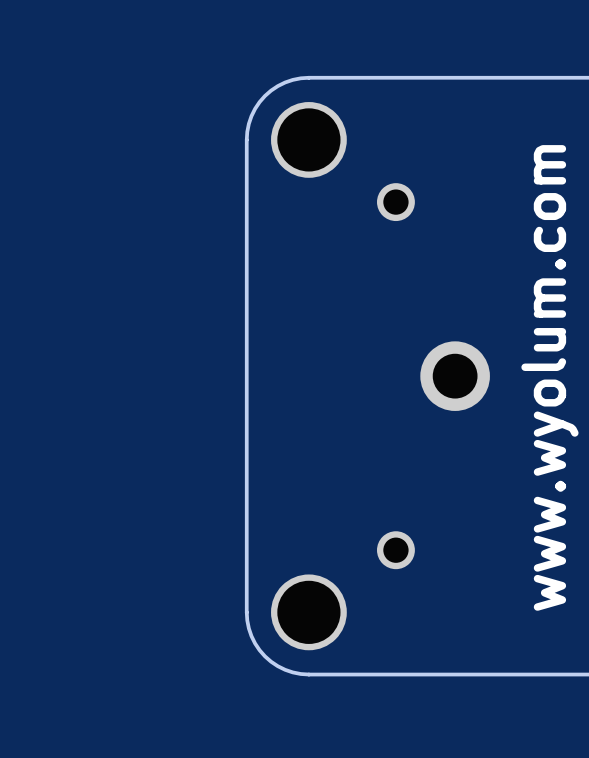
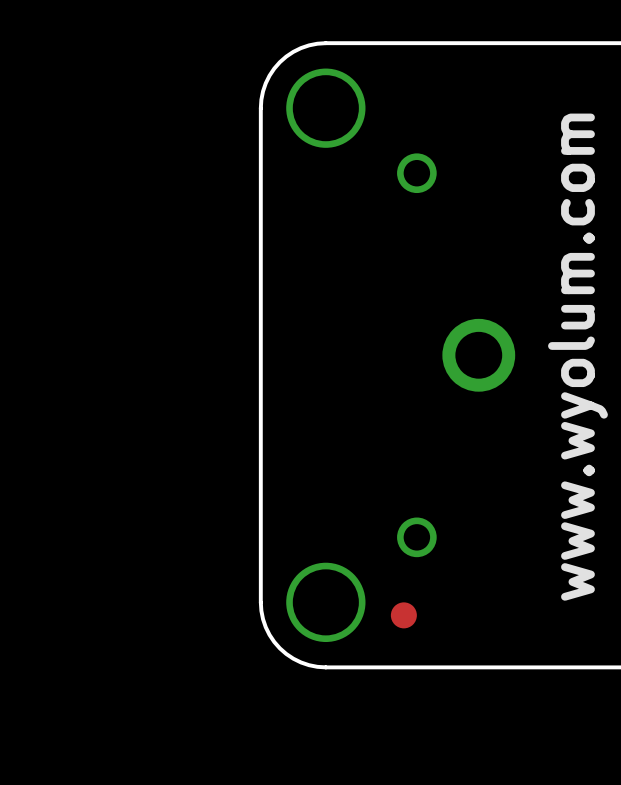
part: none -> (403, 615)

